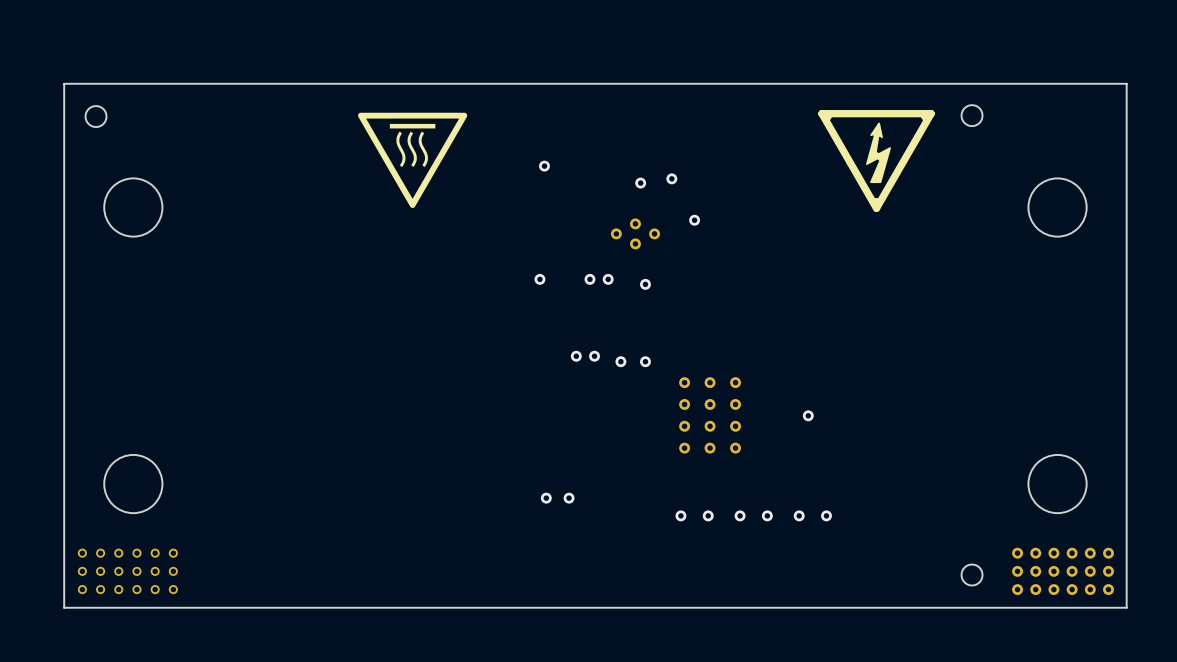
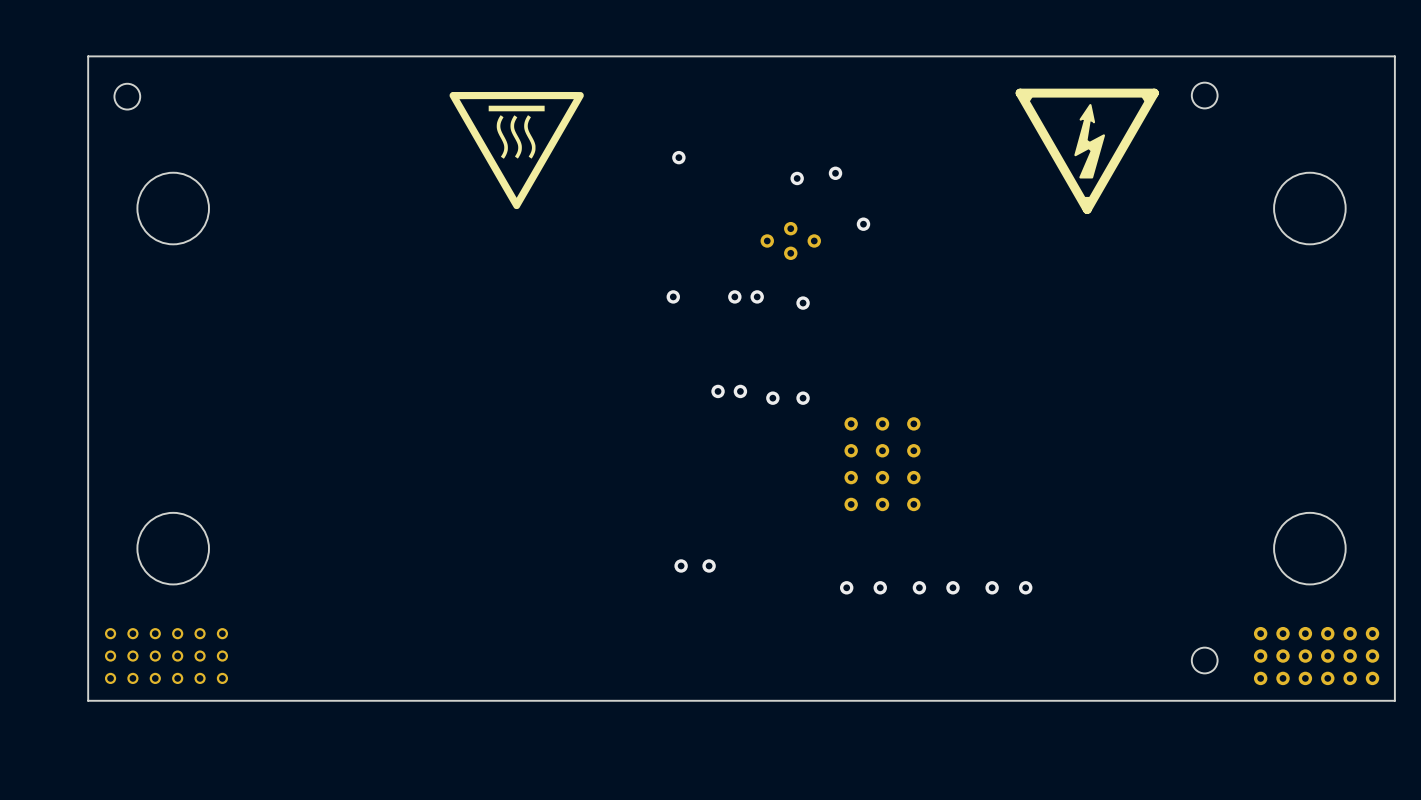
via: (808, 415) -> none

